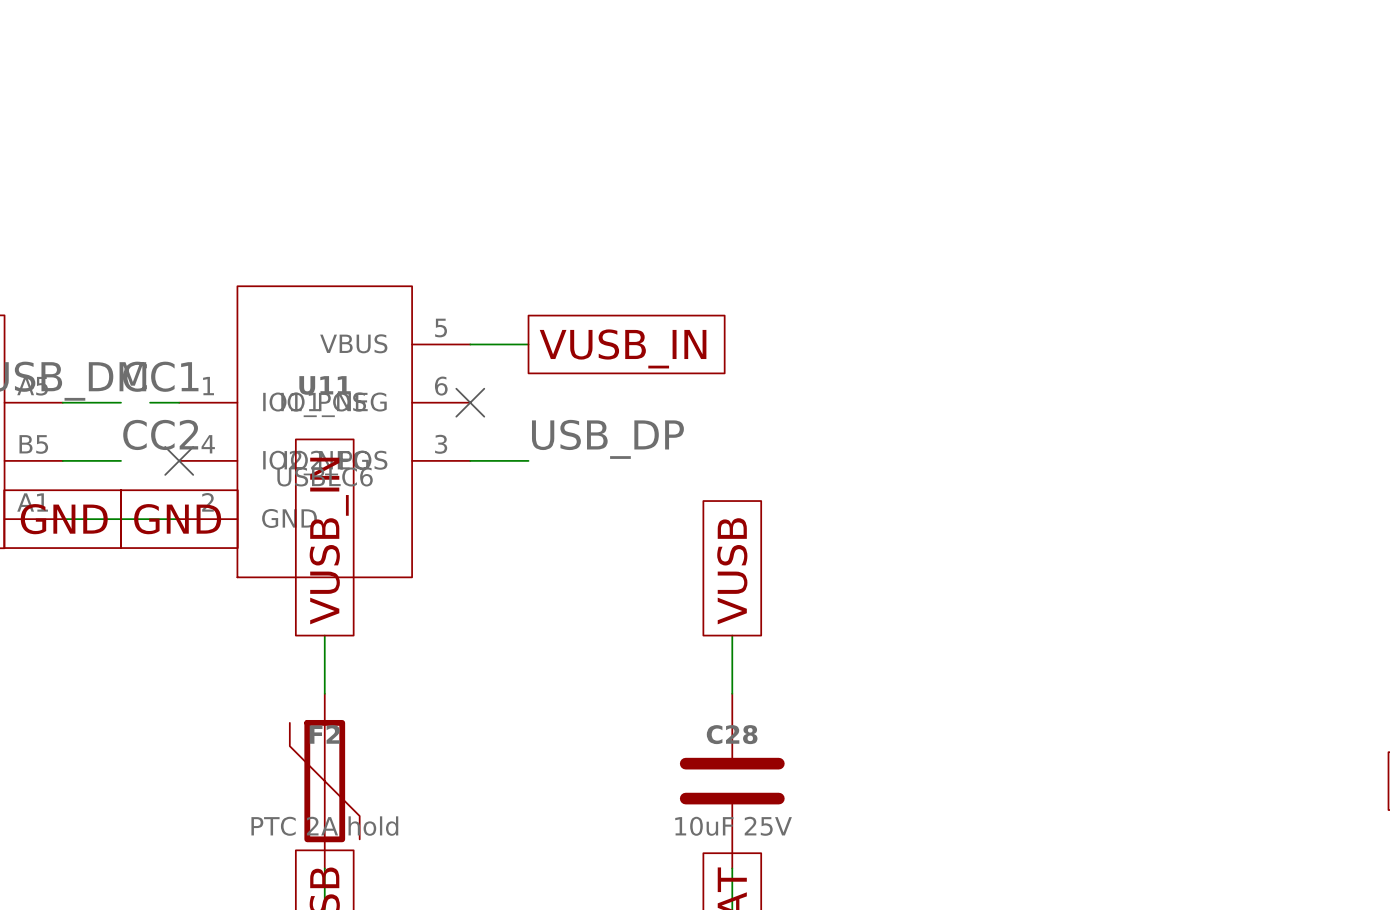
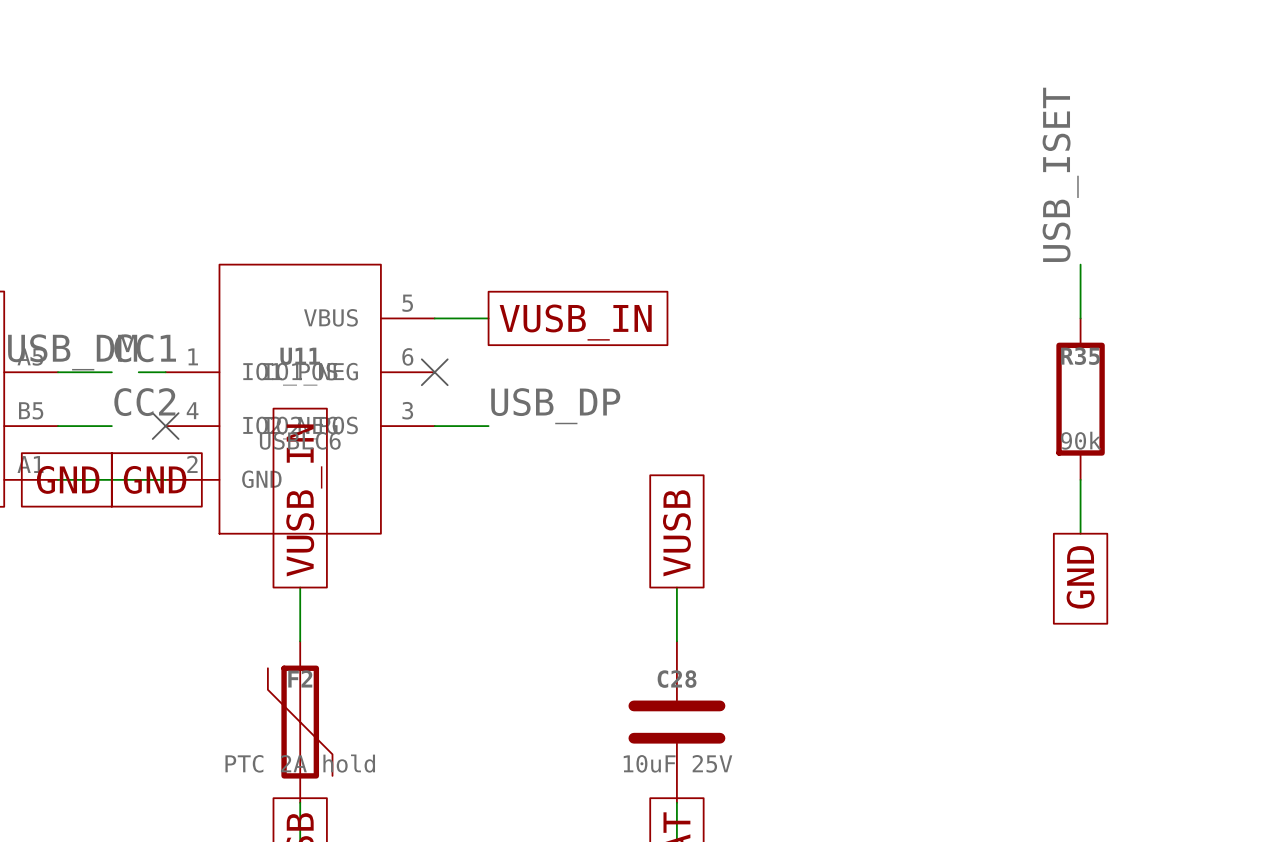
label: none -> USB_ISET (1060, 174)
wire: none -> (1080, 264) (1080, 318)
R35: none -> 90k (1080, 399)
wire: none -> (1080, 479) (1080, 533)
global label: none -> GND (1080, 577)

